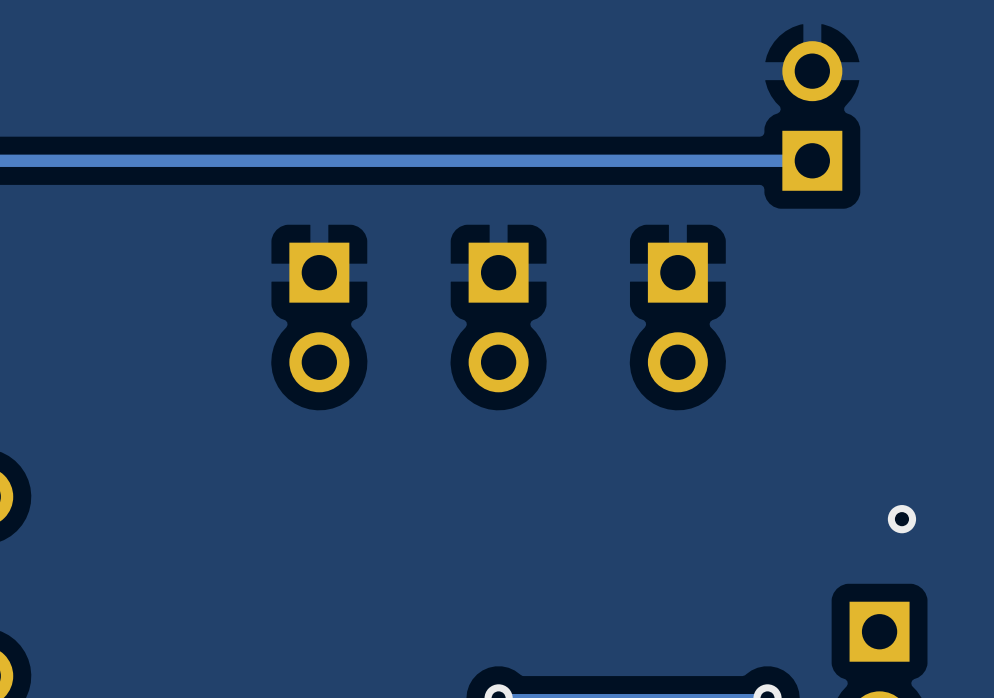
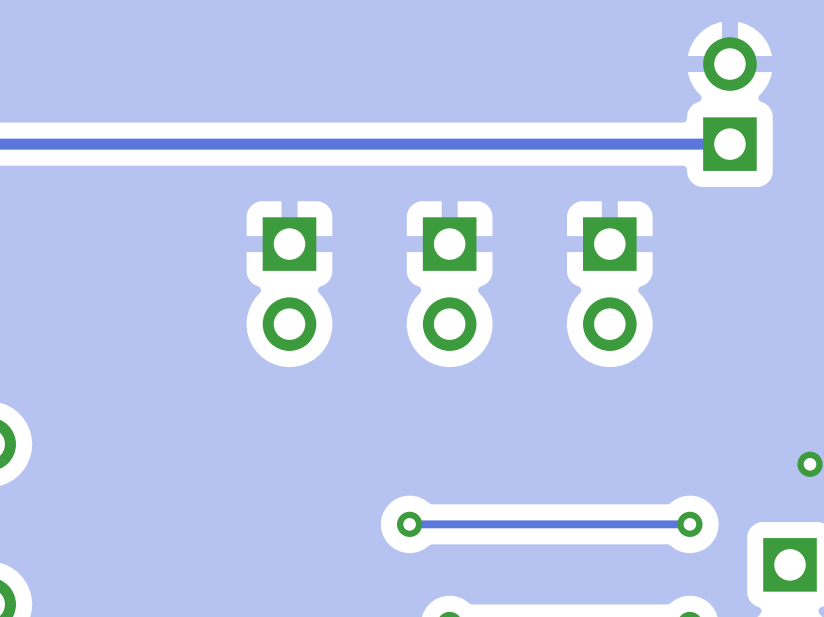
via: none -> (409, 524)
track: none -> (689, 524) (409, 524)
via: none -> (689, 524)

